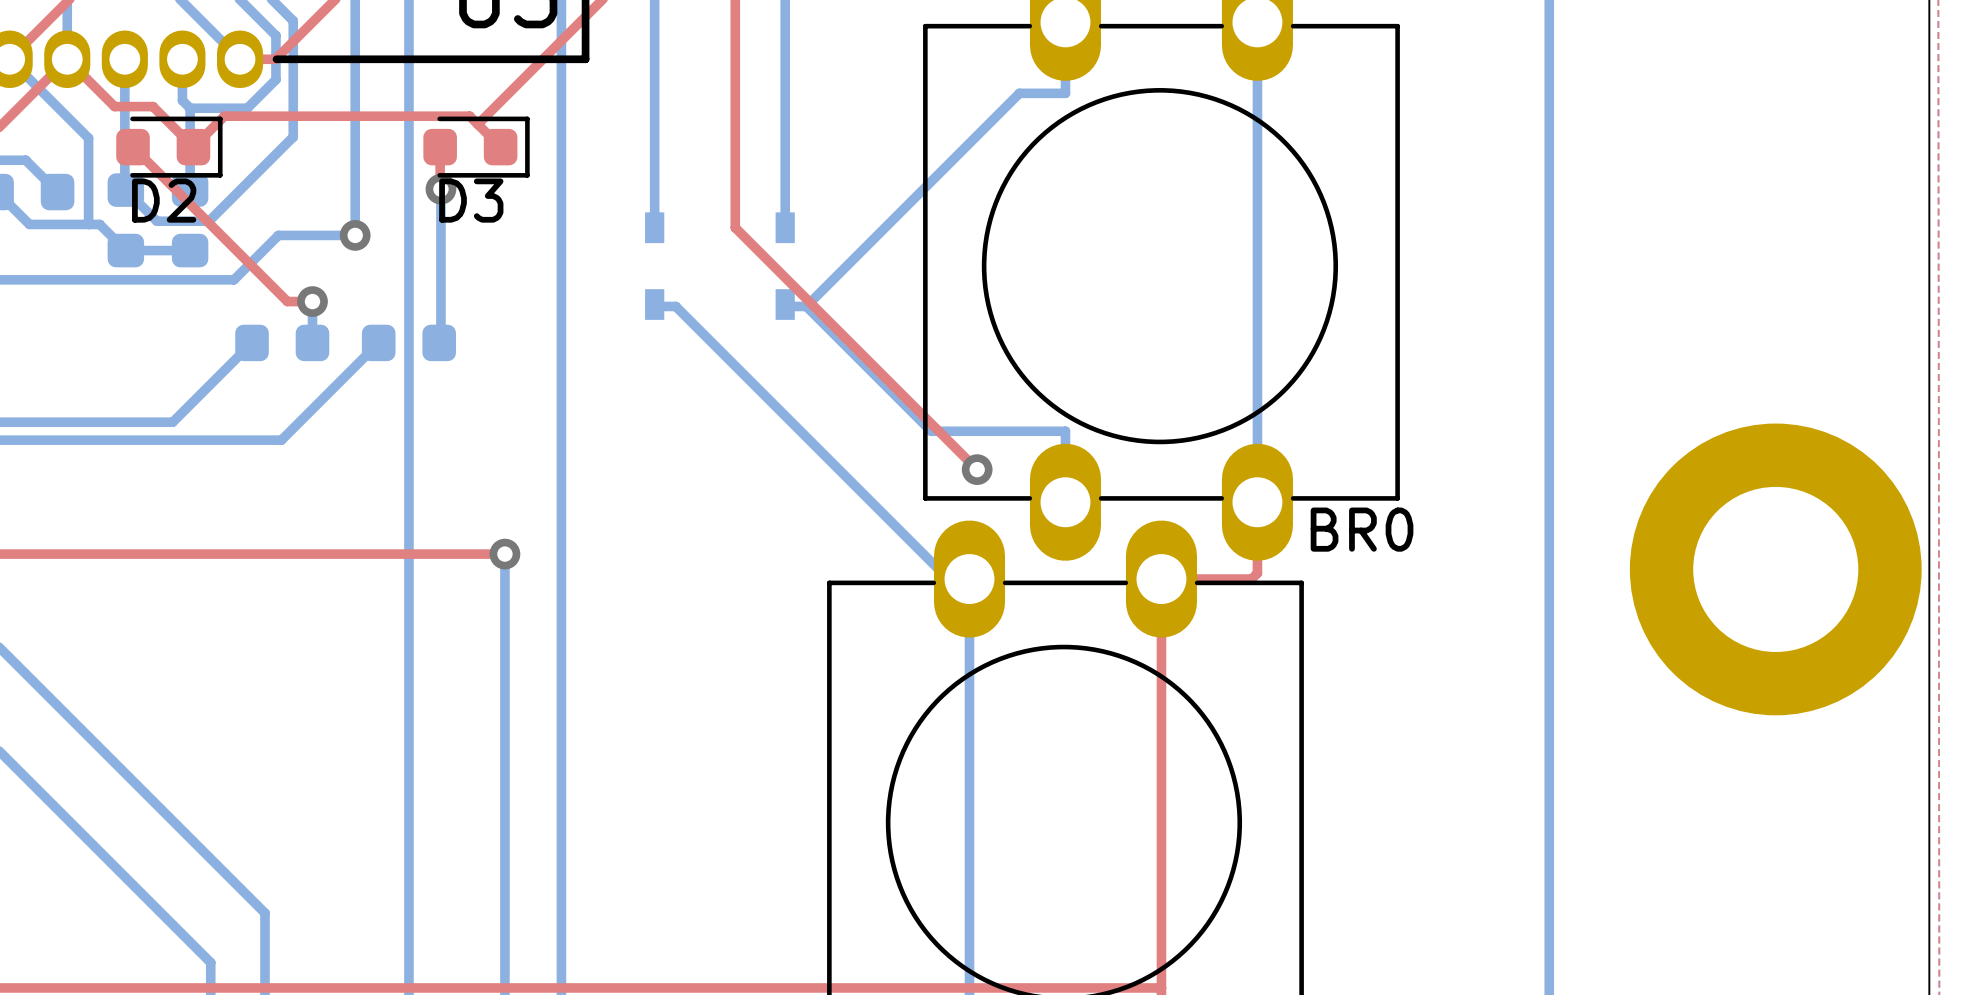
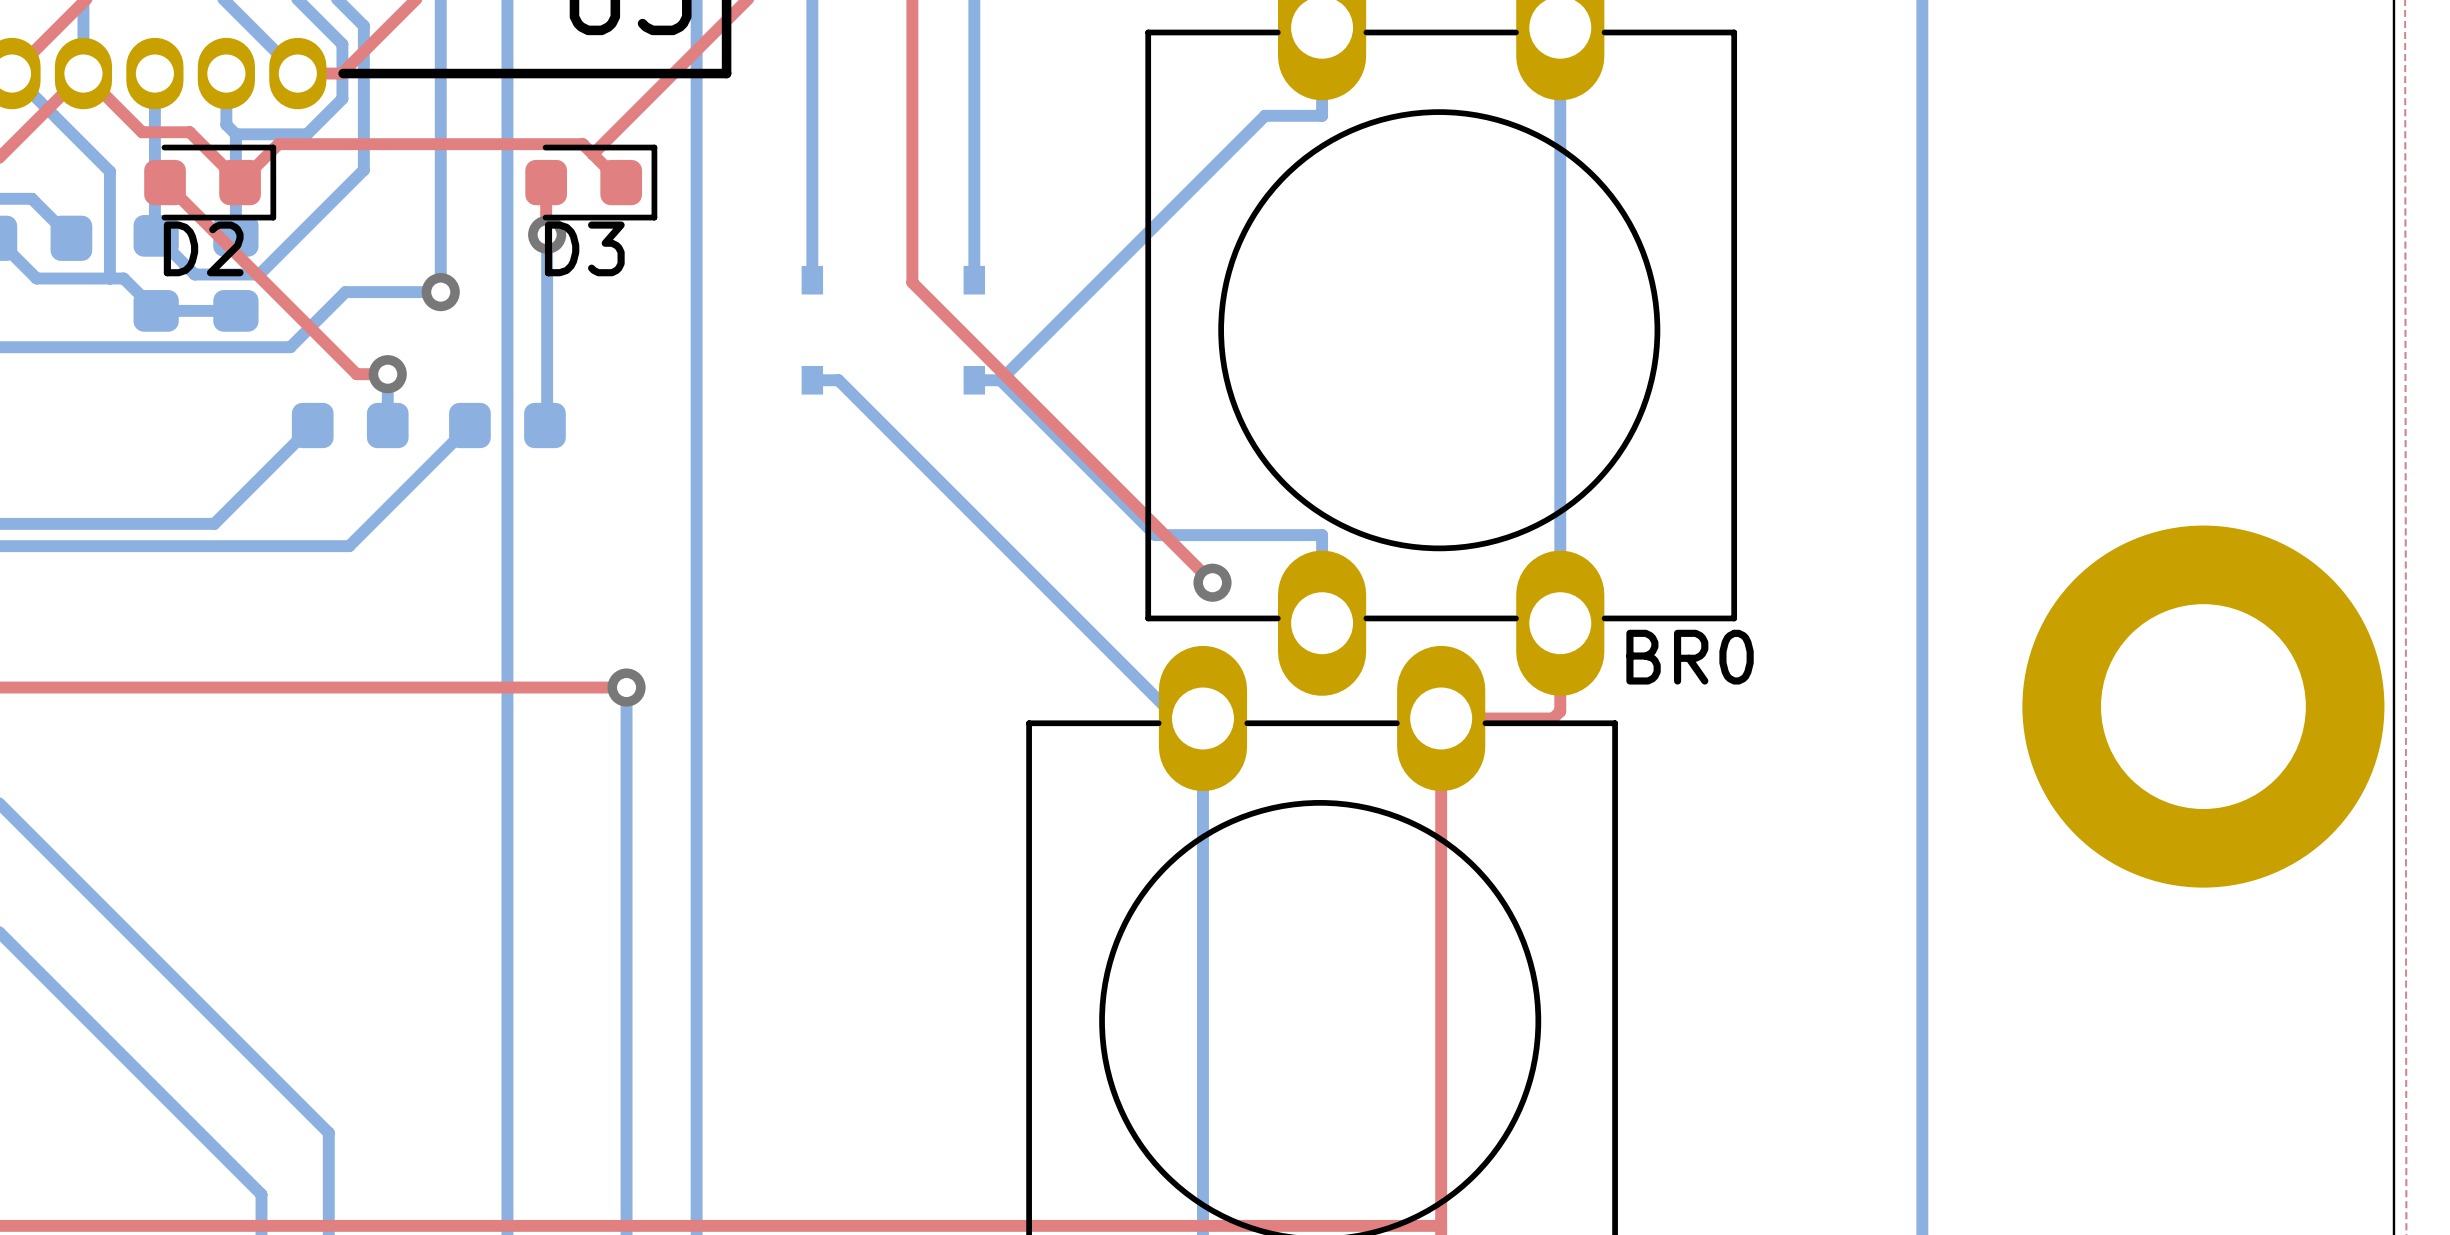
part footprint: [645, 212, 665, 320] -> [801, 265, 824, 395]
part footprint: [775, 212, 795, 320] -> [963, 265, 986, 395]

